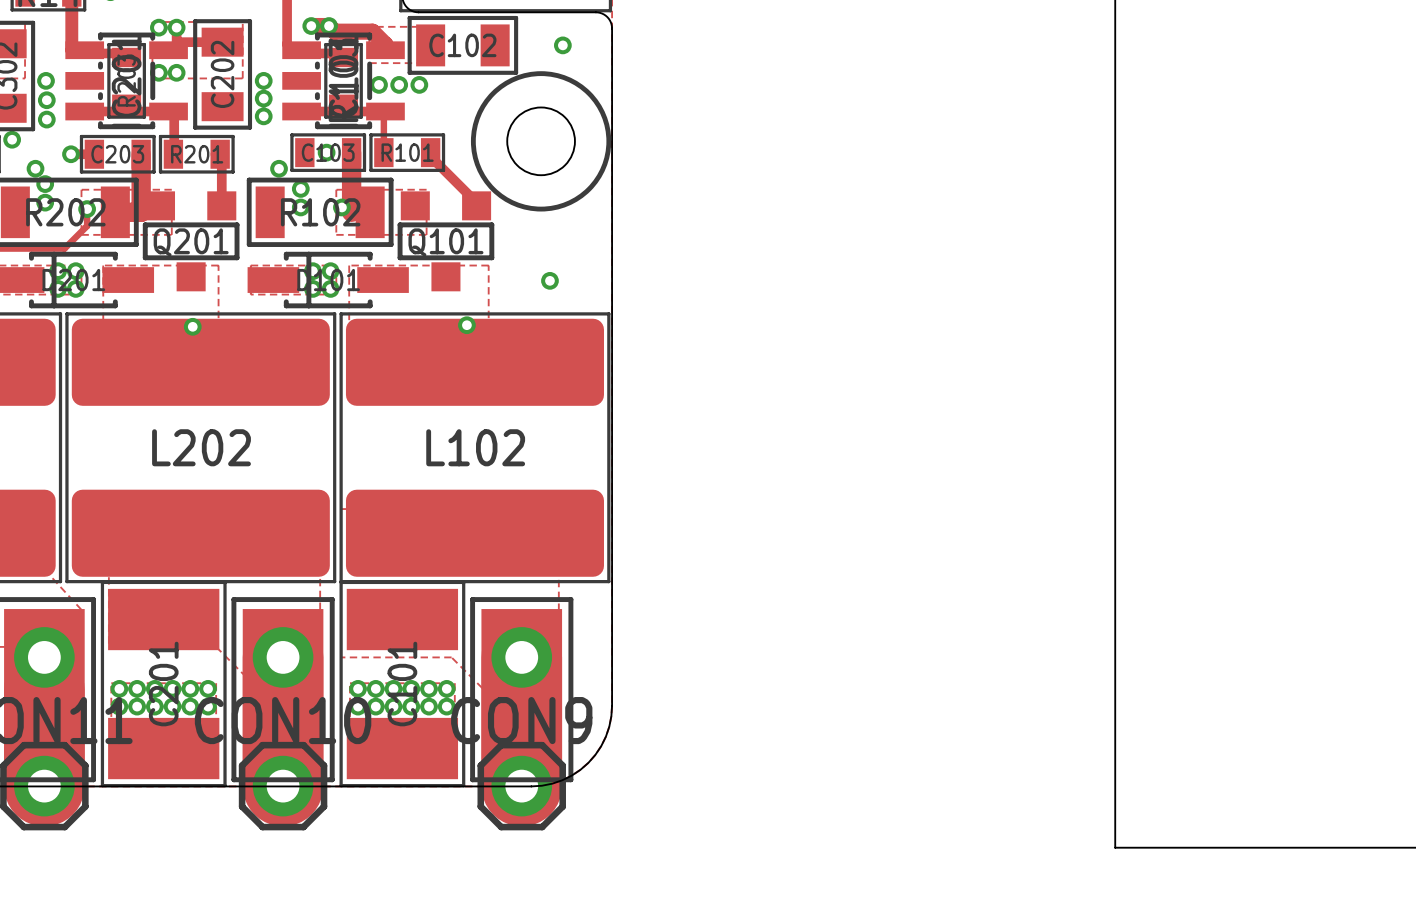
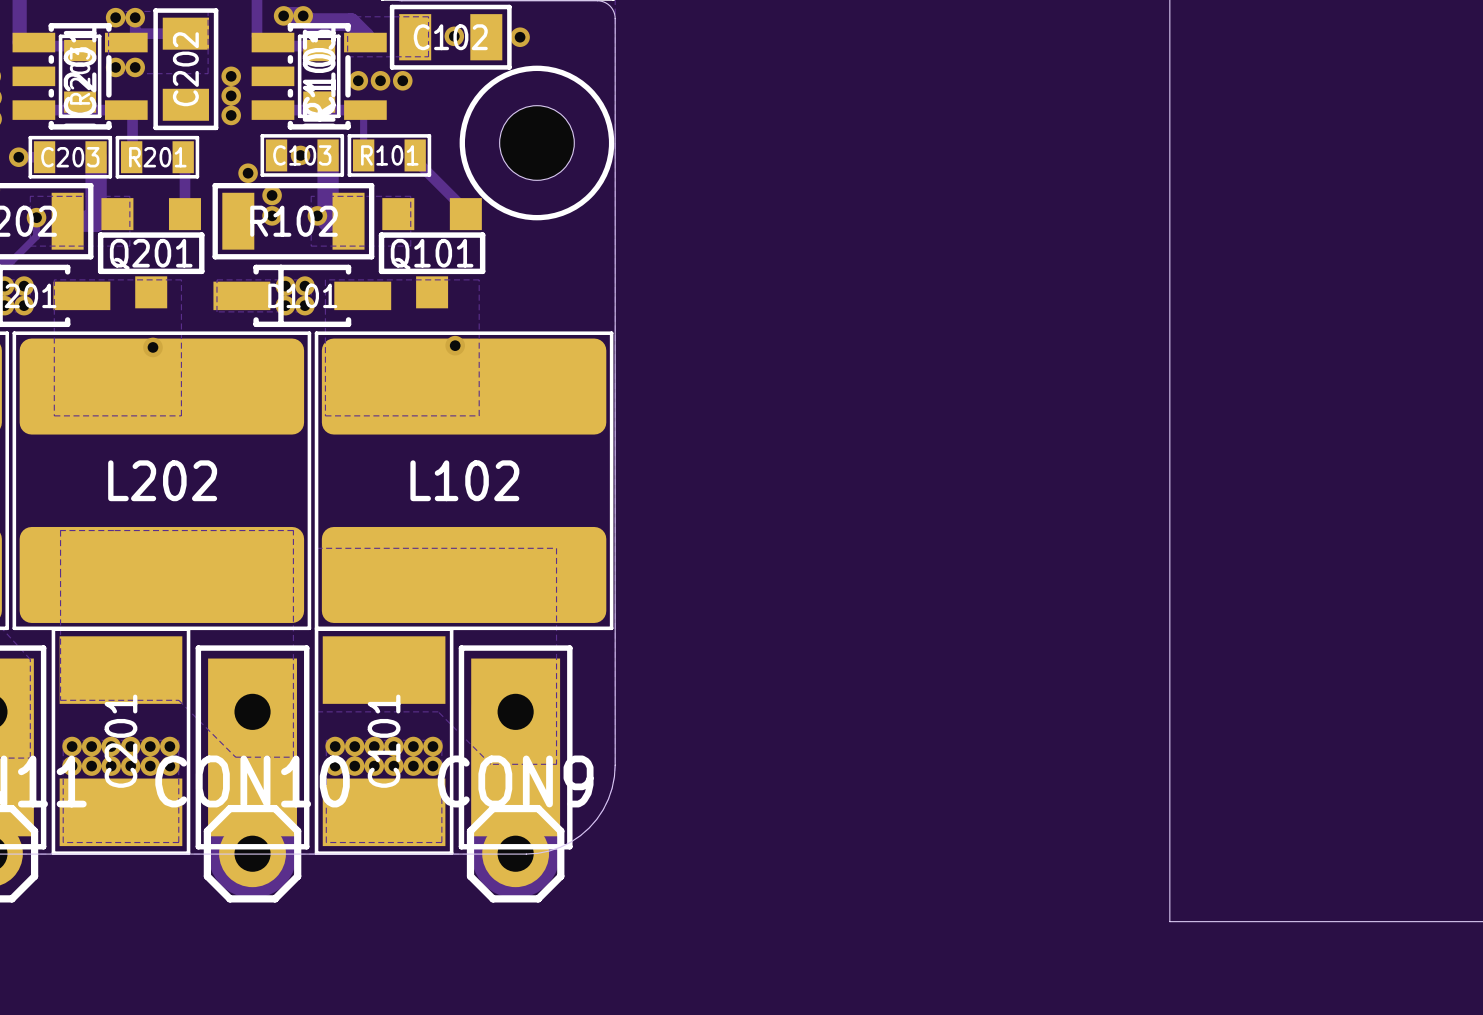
via: none -> (454, 36)
via position: (562, 45) -> (520, 37)
via: (549, 280) -> none

